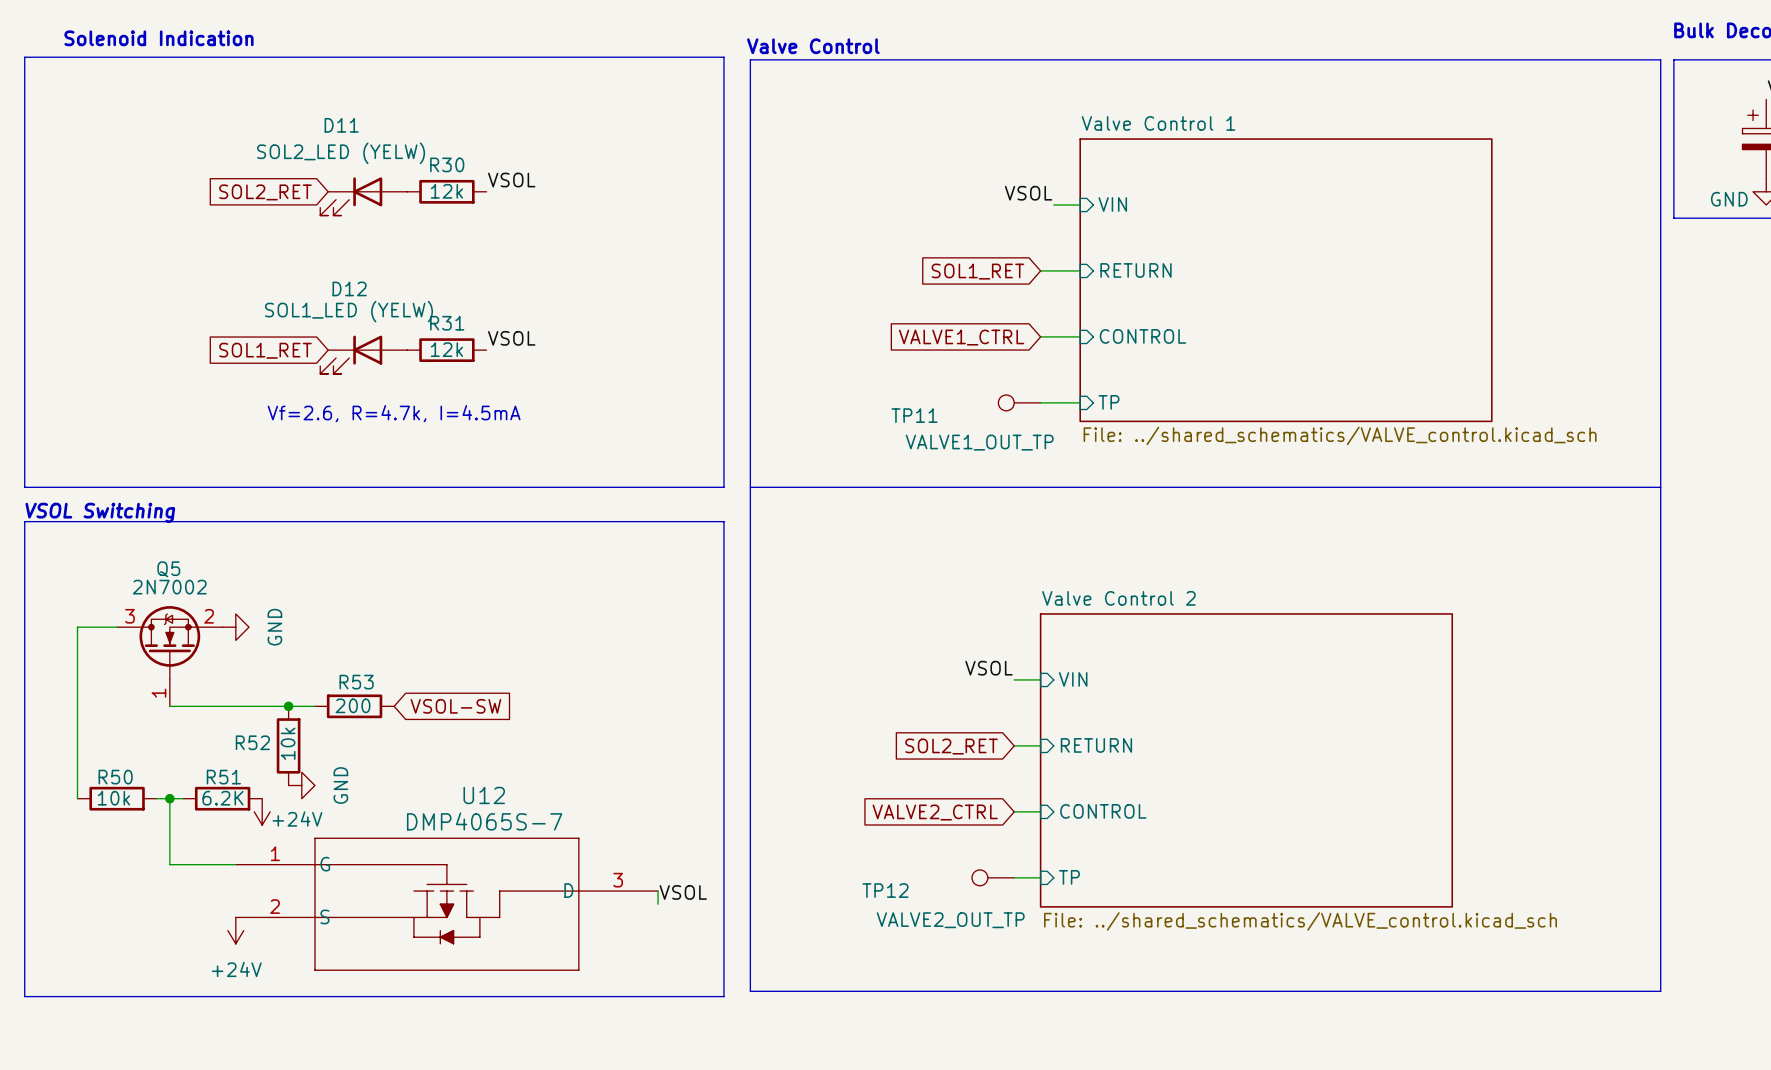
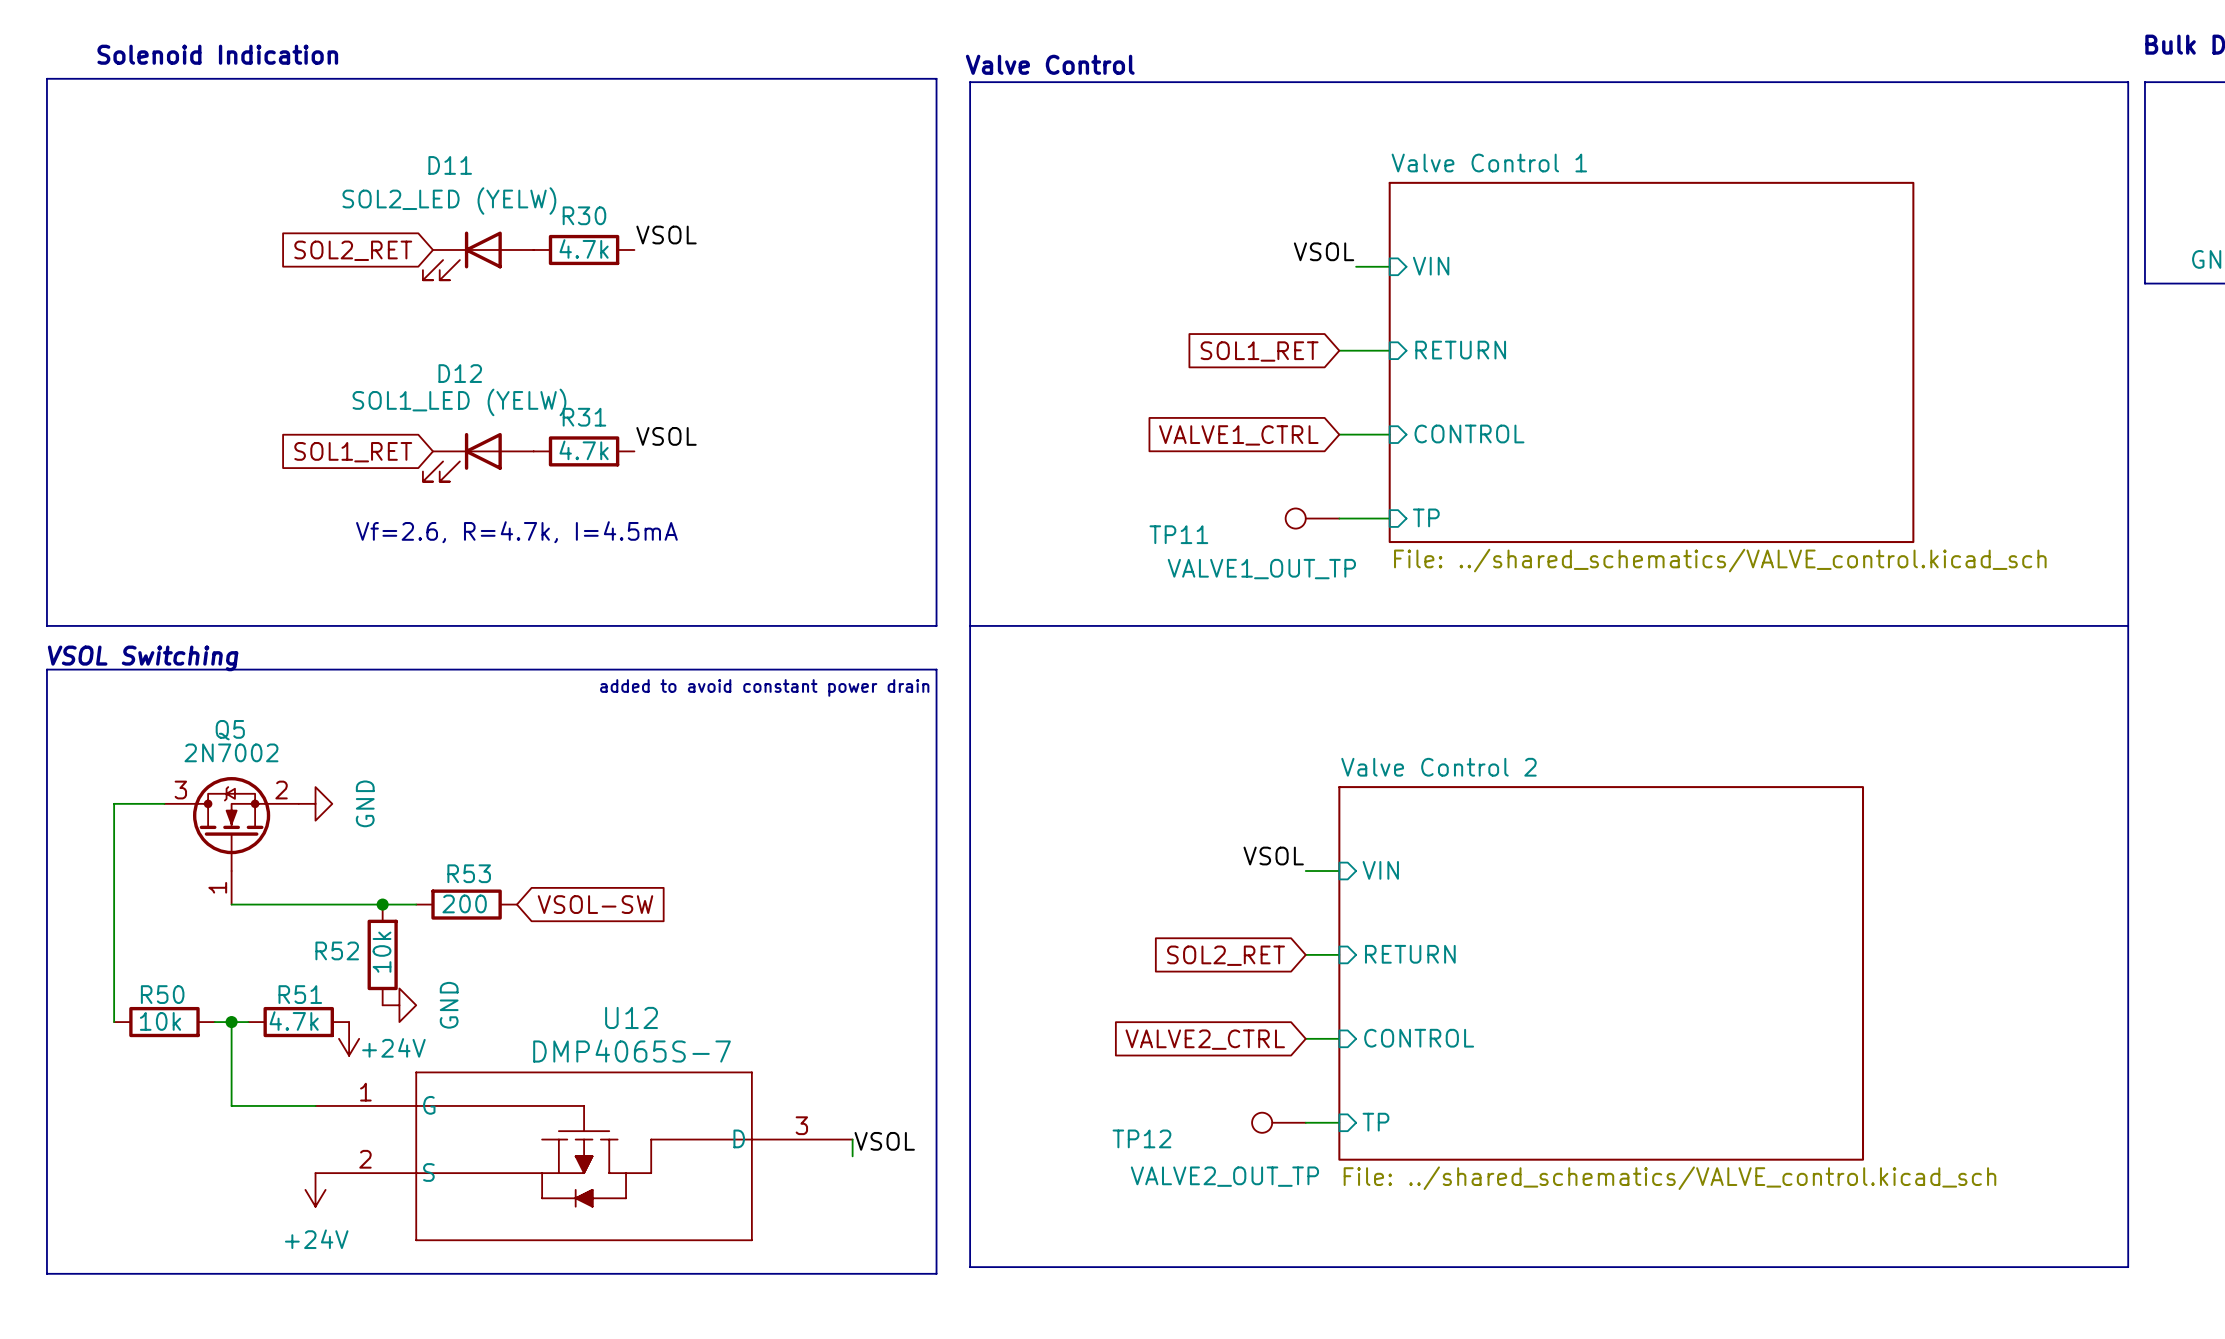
R30 value: 12k (446, 191) -> 4.7k (584, 248)
R31 value: 12k (446, 349) -> 4.7k (584, 450)
text: none -> added to avoid constant power drain (764, 687)
R51 value: 6.2K (223, 798) -> 4.7k (294, 1021)

